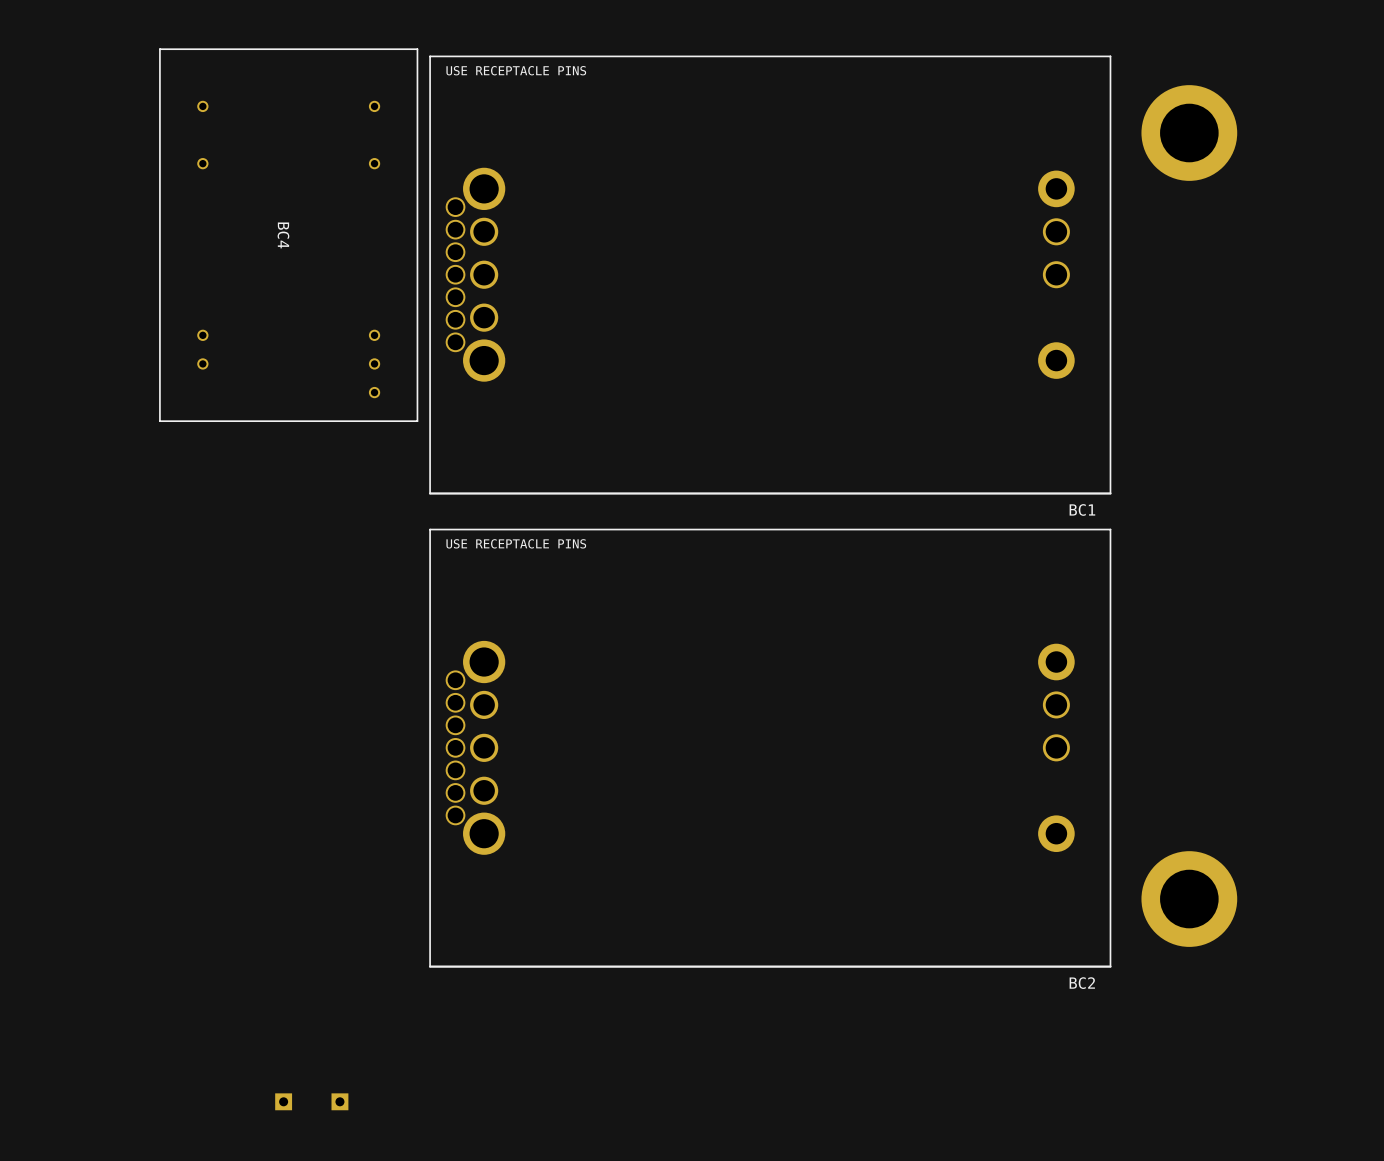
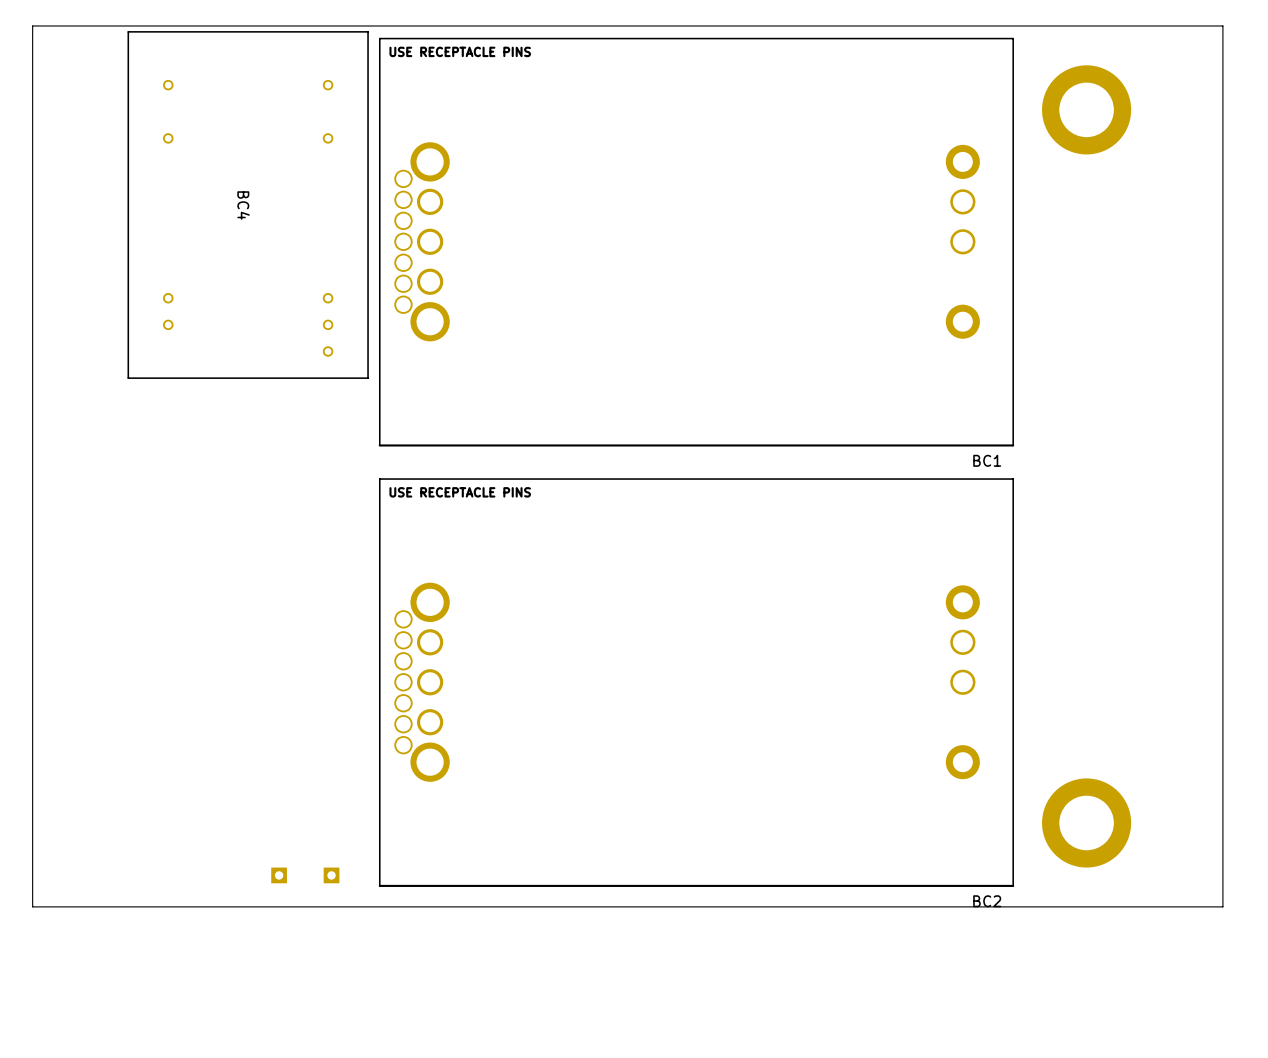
board edge: none -> (1222, 25) (32, 25) (32, 906) (1222, 906) (1222, 25)
part: none -> (279, 875)
part: none -> (331, 875)
part: (283, 1101) -> none
part: (339, 1101) -> none

